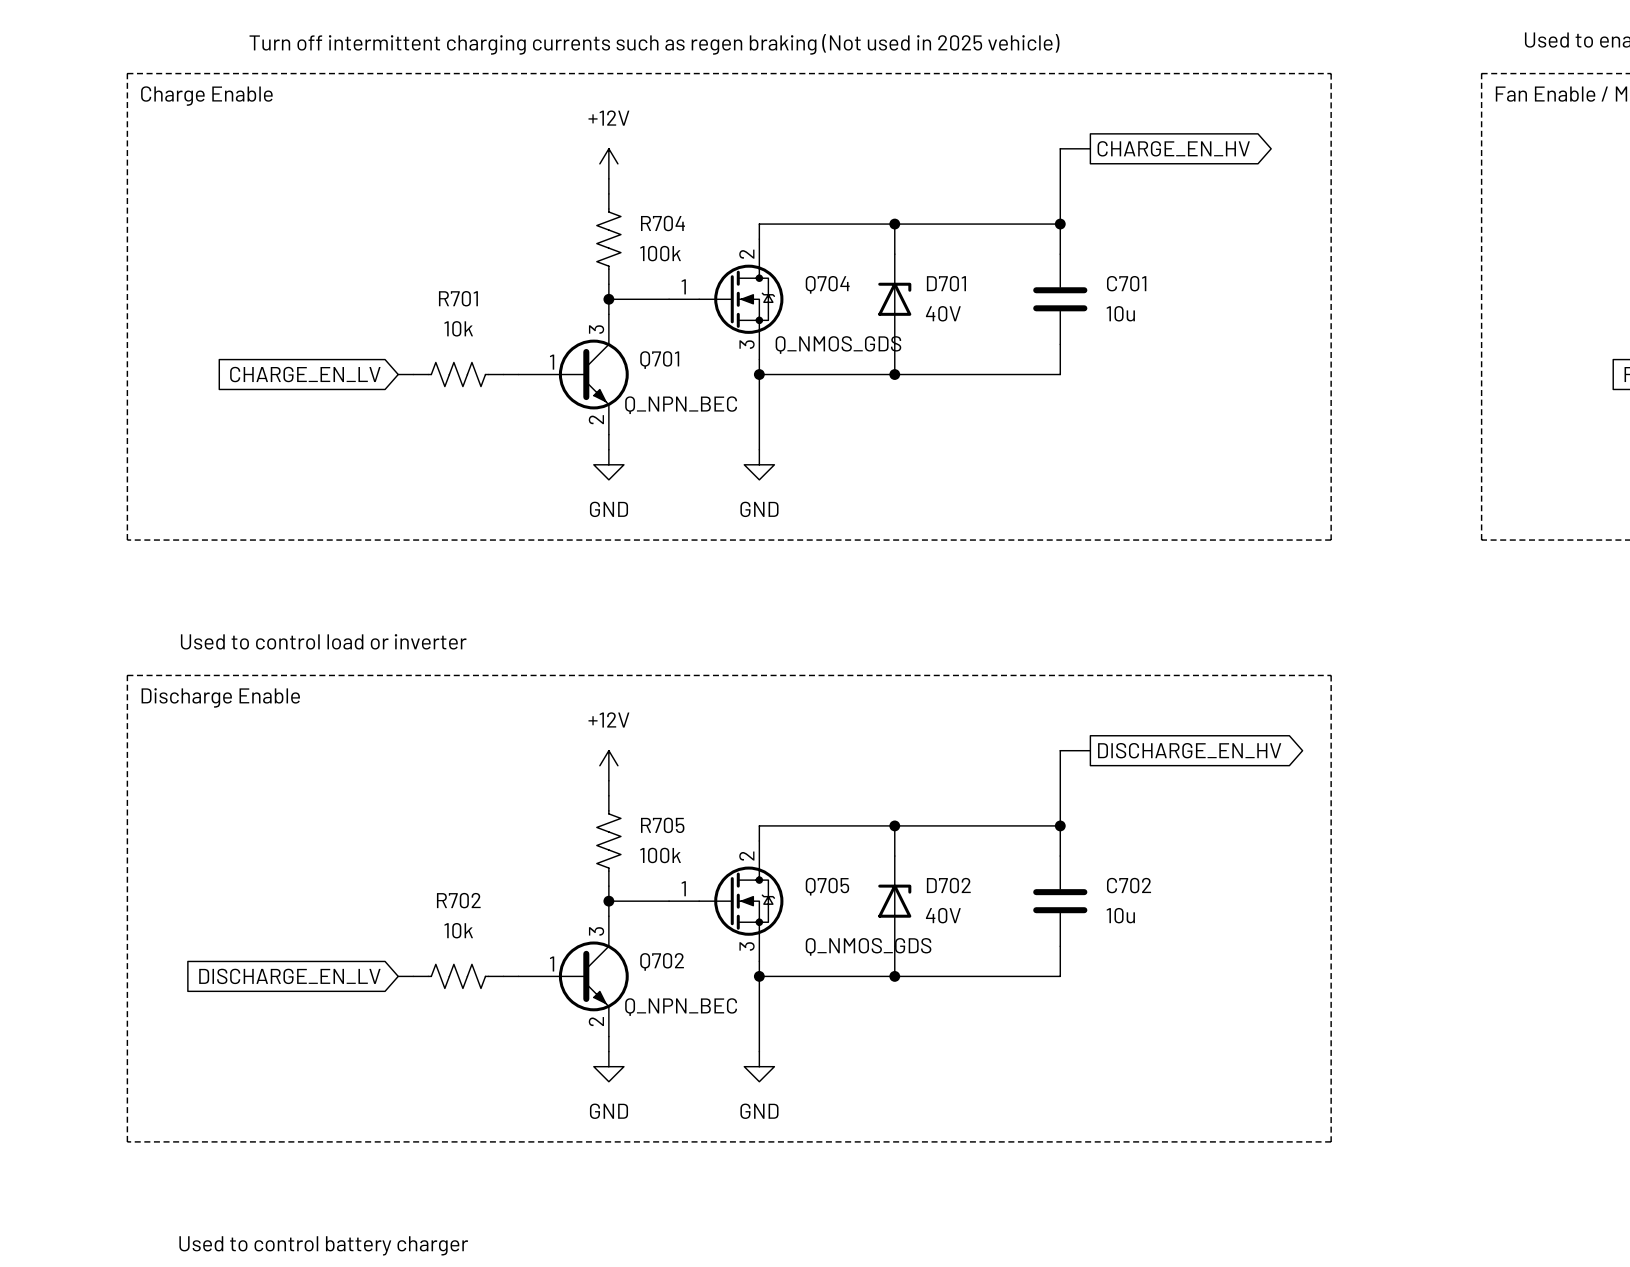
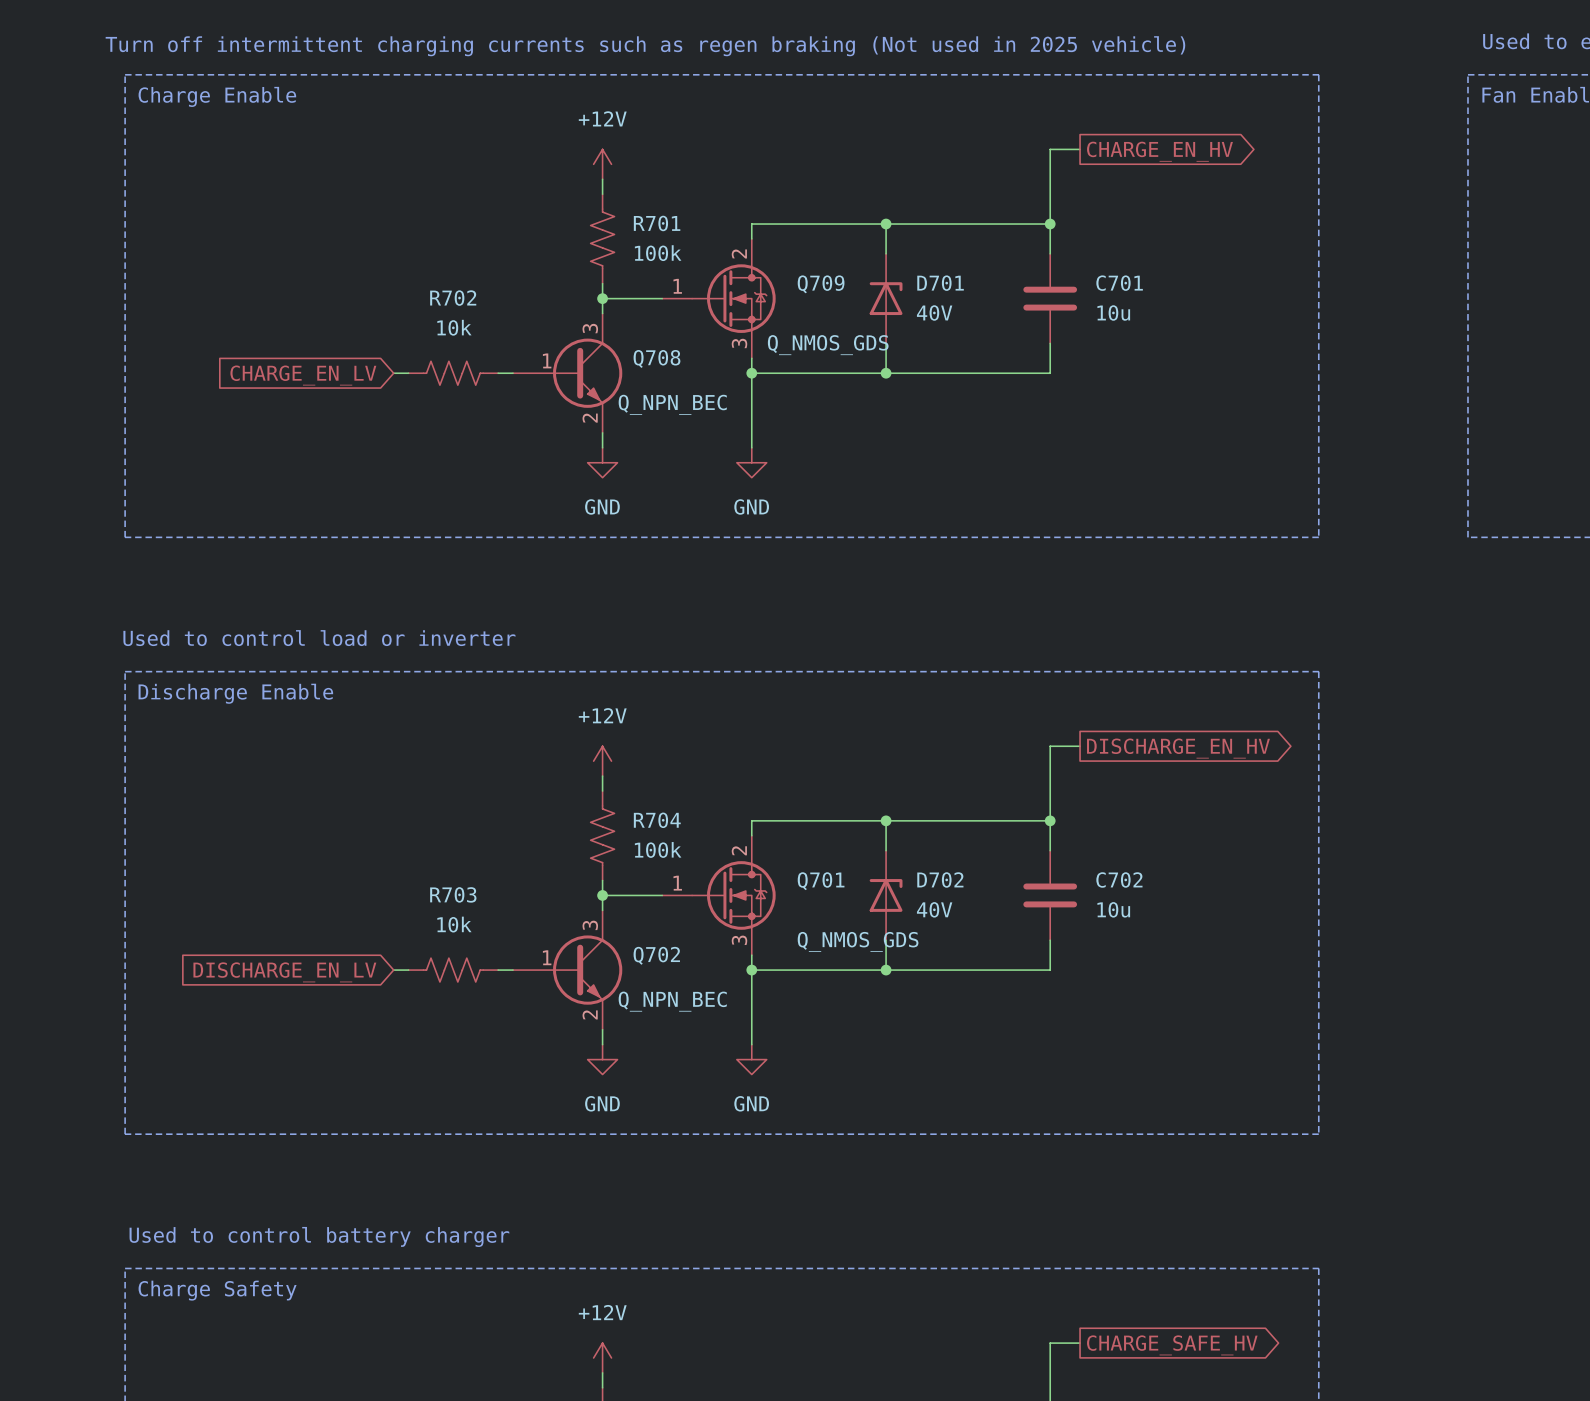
R704 name: R704 (662, 223) -> R701 (657, 223)
Q704 name: Q704 (827, 284) -> Q709 (821, 284)
R701 name: R701 (458, 298) -> R702 (453, 298)
Q701 name: Q701 (659, 360) -> Q708 (656, 358)
R705 name: R705 (662, 825) -> R704 (657, 820)
Q705 name: Q705 (827, 886) -> Q701 (821, 881)
R702 name: R702 (458, 900) -> R703 (453, 894)

